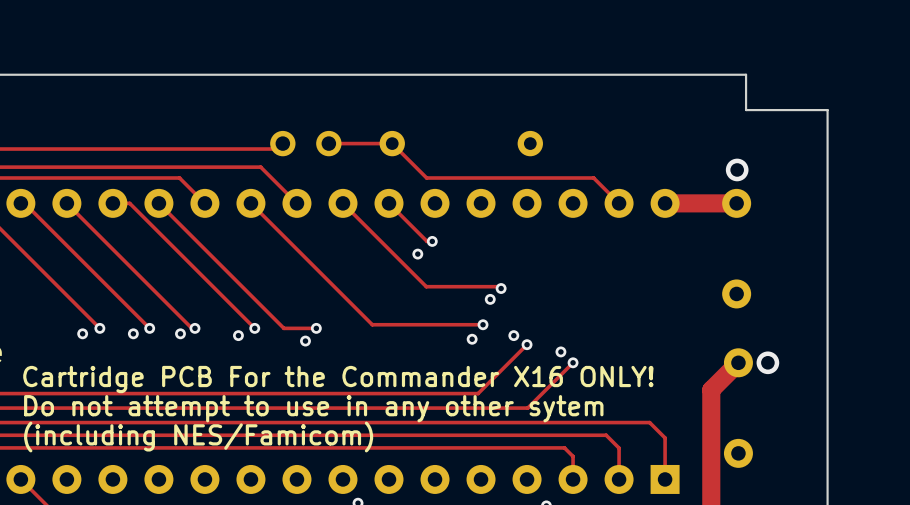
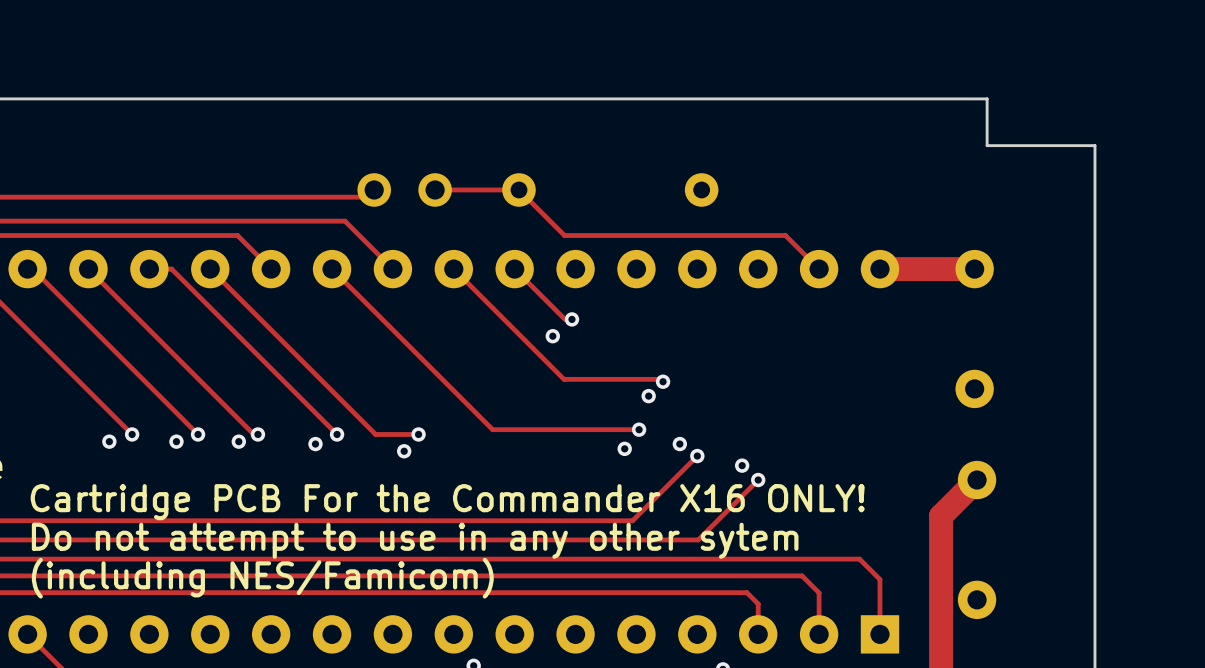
via: (737, 169) -> none
via: (767, 362) -> none

